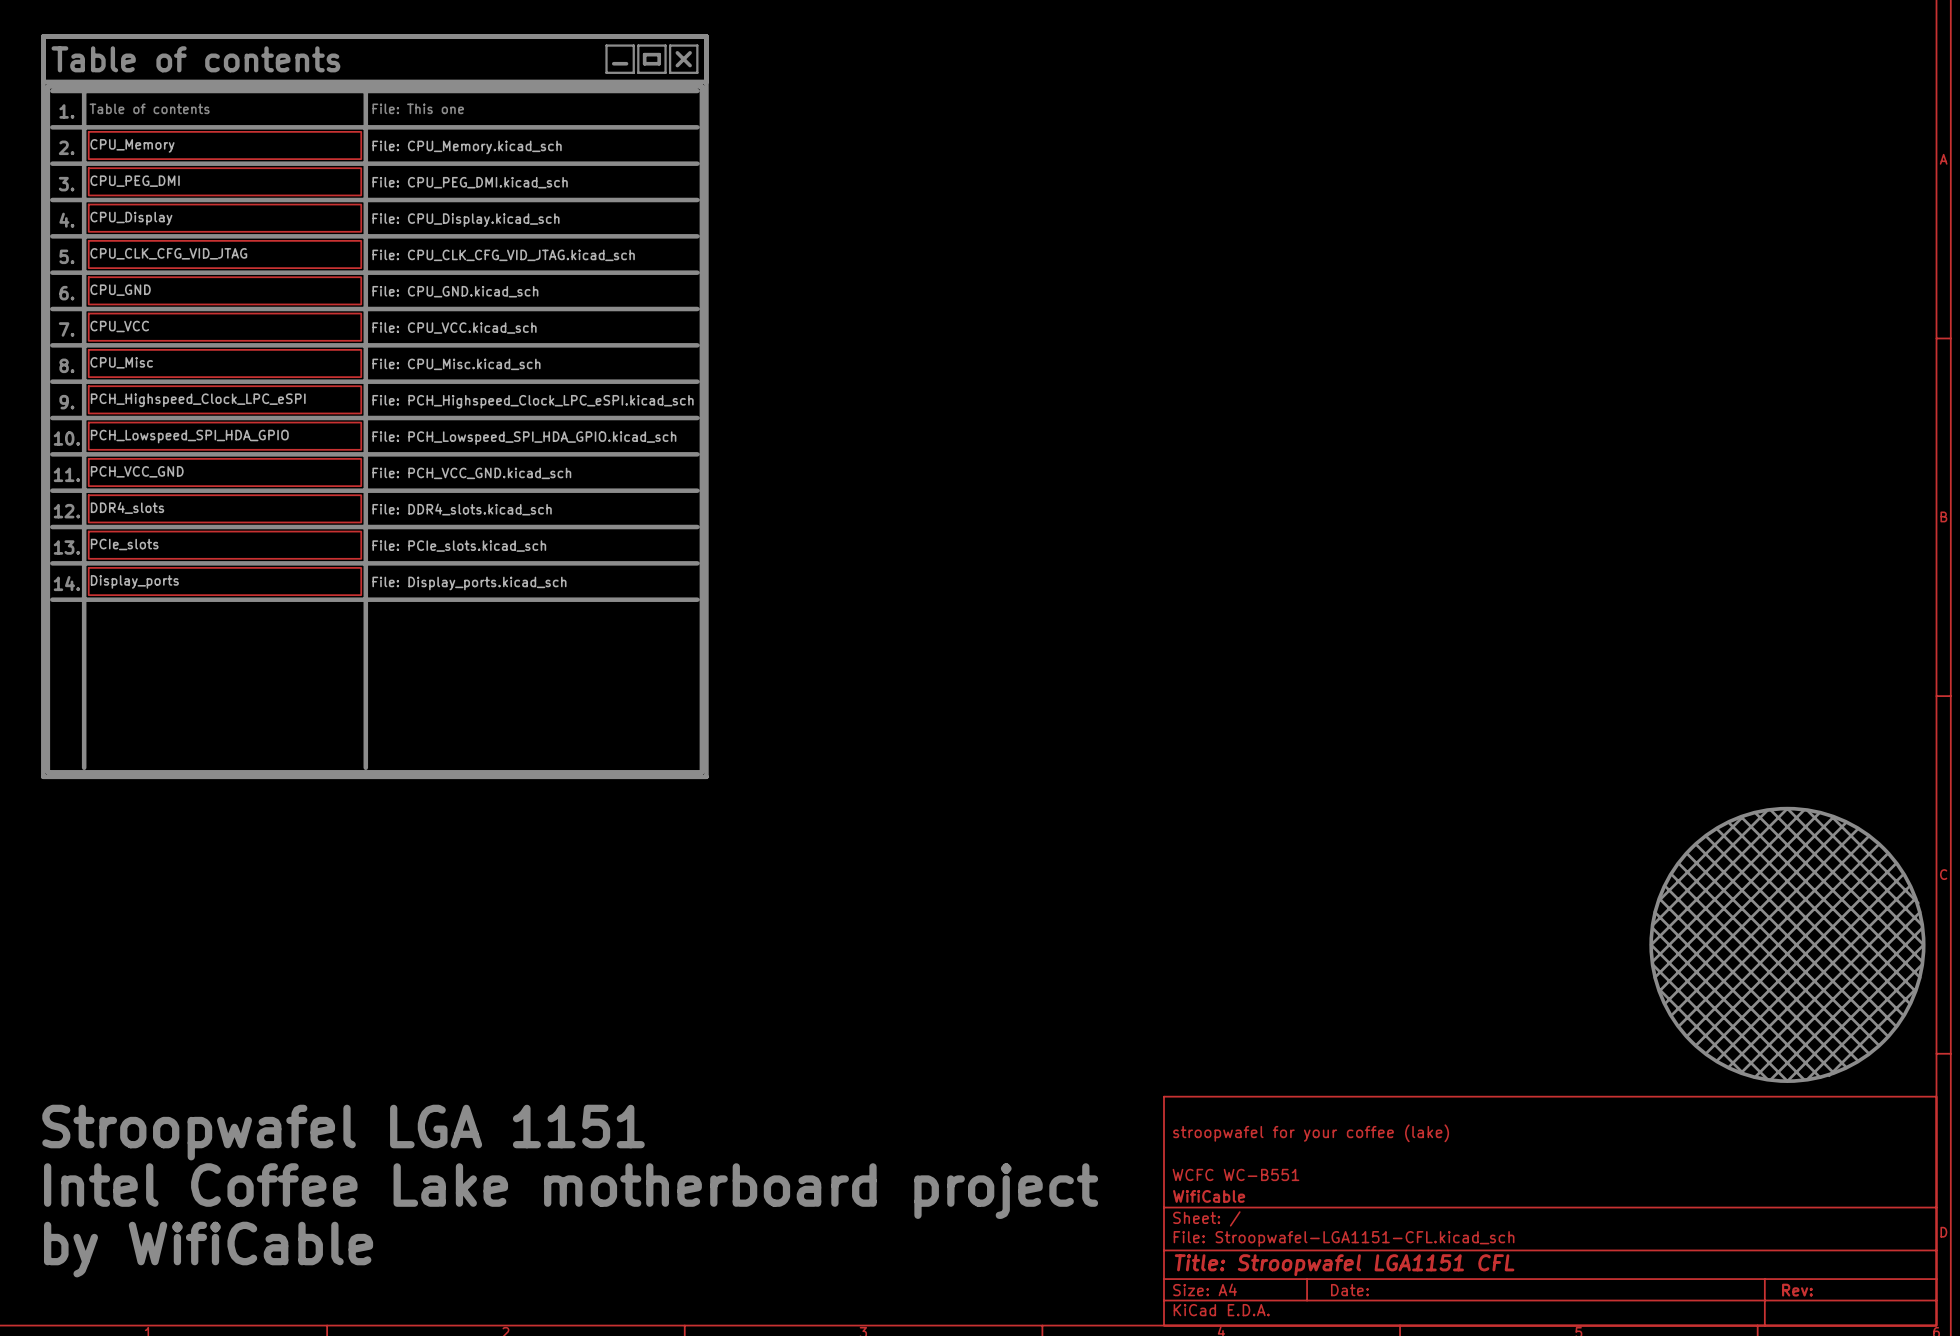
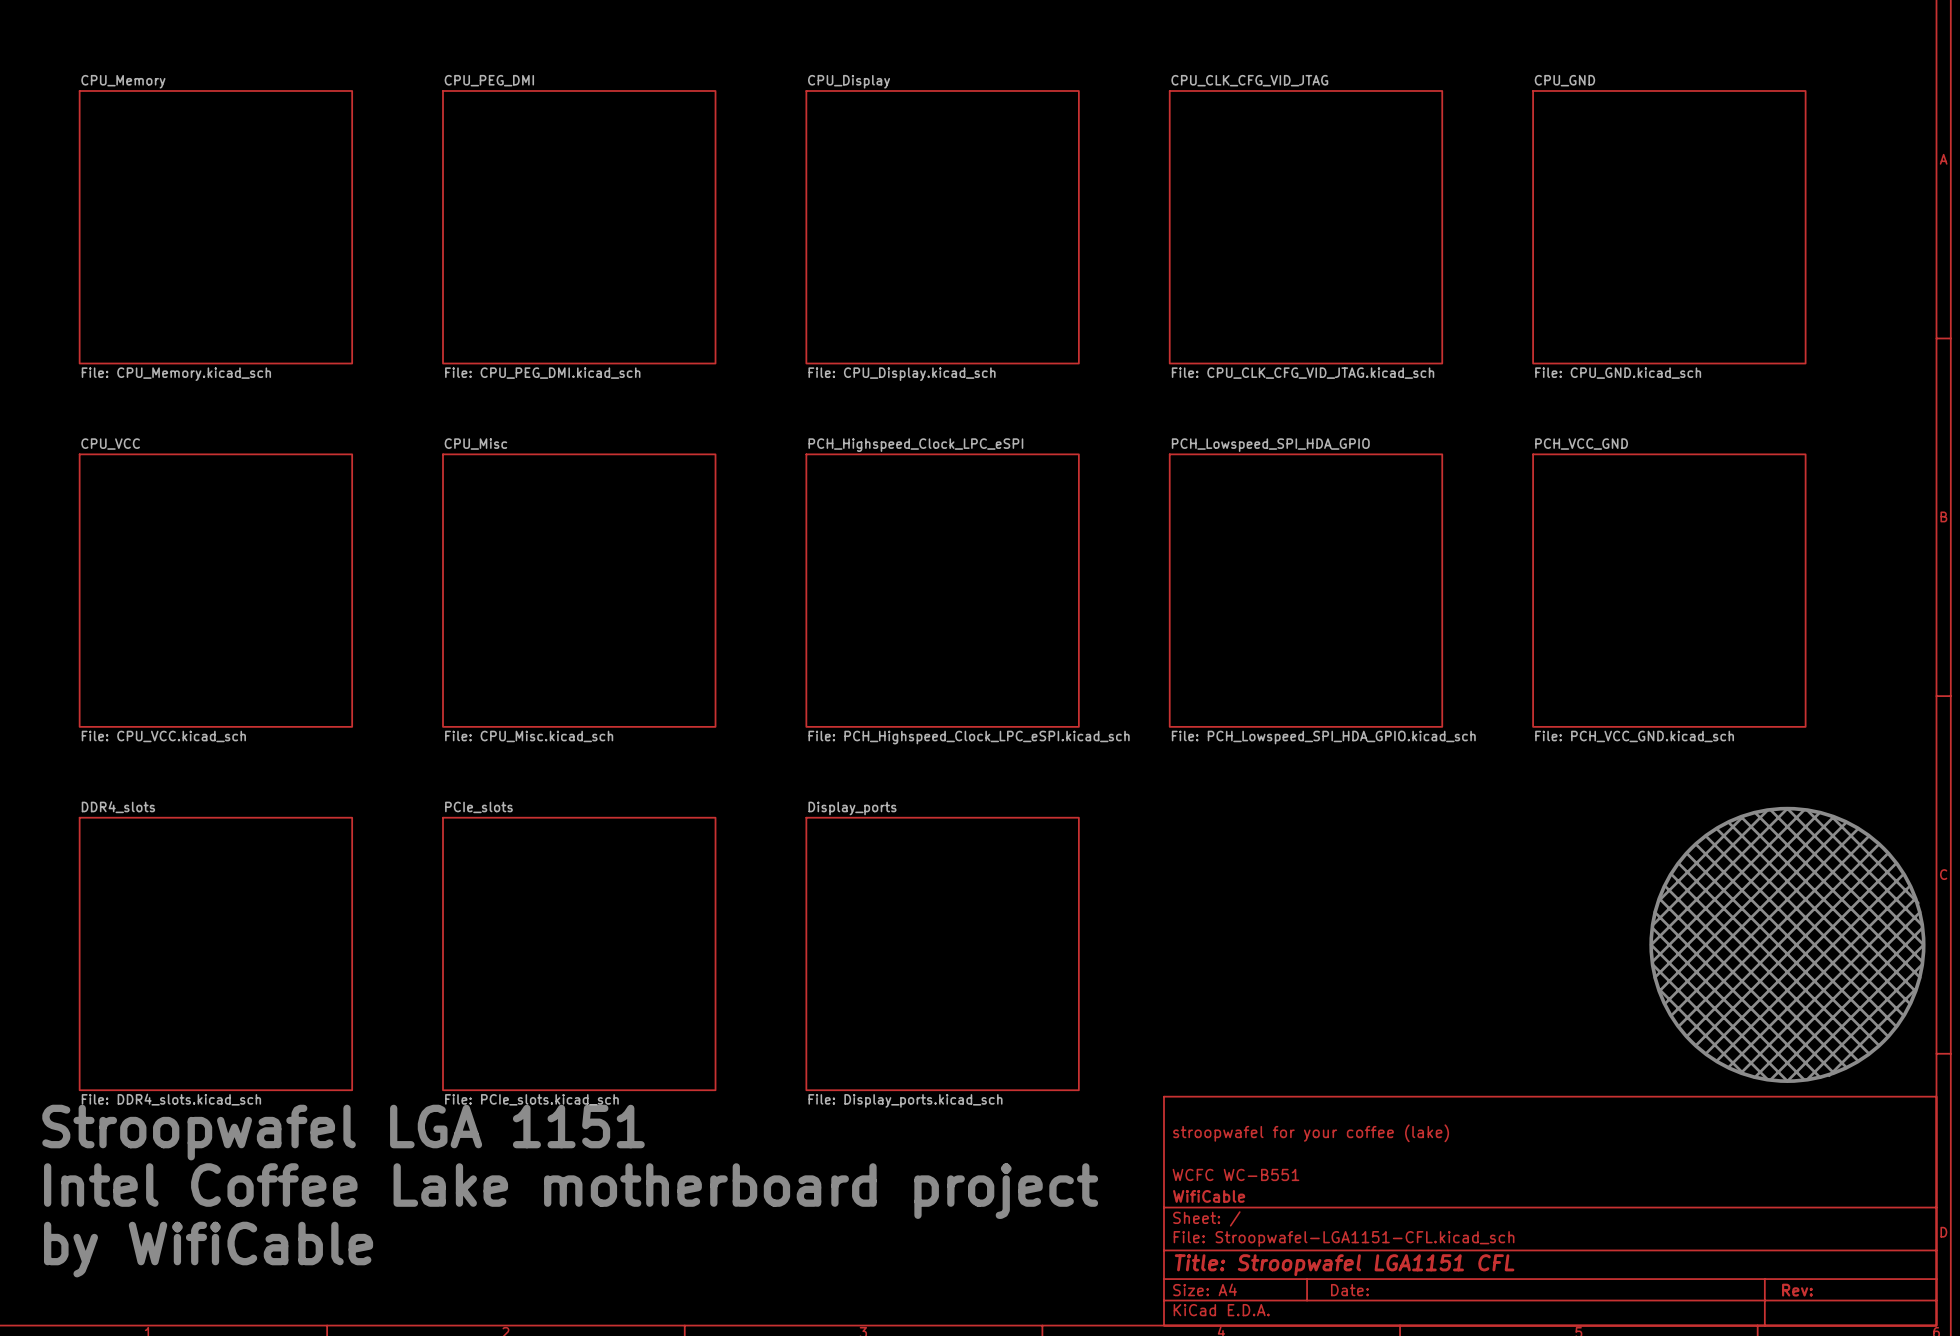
line: (43, 36) (706, 36) (706, 776) (43, 776) (43, 36) -> none
line: (606, 45) (633, 45) (633, 72) (606, 72) (606, 45) -> none
line: (638, 45) (665, 45) (665, 72) (638, 72) (638, 45) -> none
line: (670, 45) (697, 45) (697, 72) (670, 72) (670, 45) -> none
line: (677, 52) (690, 65) -> none
line: (690, 52) (677, 65) -> none
line: (644, 54) (659, 54) (659, 63) (644, 63) (644, 54) -> none
text: Table of contents (195, 59) -> none
line: (613, 63) (626, 63) -> none
line: (43, 81) (706, 81) -> none
line: (47, 86) (701, 86) (701, 772) (47, 772) (47, 86) -> none
line: (52, 90) (697, 90) -> none
line: (84, 90) (84, 767) -> none
line: (365, 90) (365, 767) -> none
text: Table of contents (149, 108) -> none
text: File: This one (418, 108) -> none
text: 1. (66, 111) -> none
line: (52, 127) (697, 127) -> none
sheet CPU_Memory: File: CPU_Memory.kicad_sch (224, 145) -> none
text: 2. (66, 147) -> none
line: (52, 163) (697, 163) -> none
sheet CPU_PEG_DMI: File: CPU_PEG_DMI.kicad_sch (224, 181) -> none
text: 3. (66, 184) -> none
line: (52, 200) (697, 200) -> none
sheet CPU_Display: File: CPU_Display.kicad_sch (224, 218) -> none
text: 4. (66, 220) -> none
sheet CPU_Memory: none -> File: CPU_Memory.kicad_sch (215, 227)
sheet CPU_PEG_DMI: none -> File: CPU_PEG_DMI.kicad_sch (579, 227)
sheet CPU_Display: none -> File: CPU_Display.kicad_sch (942, 227)
sheet CPU_CLK_CFG_VID_JTAG: none -> File: CPU_CLK_CFG_VID_JTAG.kicad_sch (1305, 227)
sheet CPU_GND: none -> File: CPU_GND.kicad_sch (1669, 227)
line: (52, 236) (697, 236) -> none
sheet CPU_CLK_CFG_VID_JTAG: File: CPU_CLK_CFG_VID_JTAG.kicad_sch (224, 254) -> none
text: 5. (66, 256) -> none
line: (52, 272) (697, 272) -> none
sheet CPU_GND: File: CPU_GND.kicad_sch (224, 290) -> none
text: 6. (66, 293) -> none
line: (52, 309) (697, 309) -> none
sheet CPU_VCC: File: CPU_VCC.kicad_sch (224, 327) -> none
text: 7. (66, 329) -> none
line: (52, 345) (697, 345) -> none
sheet CPU_Misc: File: CPU_Misc.kicad_sch (224, 363) -> none
text: 8. (66, 365) -> none
line: (52, 381) (697, 381) -> none
sheet PCH_Highspeed_Clock_LPC_eSPI: File: PCH_Highspeed_Clock_LPC_eSPI.kicad_sch (224, 399) -> none
text: 9. (66, 402) -> none
line: (52, 418) (697, 418) -> none
sheet PCH_Lowspeed_SPI_HDA_GPIO: File: PCH_Lowspeed_SPI_HDA_GPIO.kicad_sch (224, 436) -> none
text: 10. (66, 438) -> none
line: (52, 454) (697, 454) -> none
sheet PCH_VCC_GND: File: PCH_VCC_GND.kicad_sch (224, 472) -> none
text: 11. (66, 474) -> none
line: (52, 490) (697, 490) -> none
sheet DDR4_slots shape: [88, 494, 362, 524] -> [79, 817, 353, 1091]
sheet DDR4_slots name position: DDR4_slots (127, 507) -> DDR4_slots (118, 807)
sheet DDR4_slots value position: File: DDR4_slots.kicad_sch (462, 509) -> File: DDR4_slots.kicad_sch (171, 1099)
text: 12. (66, 511) -> none
line: (52, 527) (697, 527) -> none
sheet PCIe_slots: File: PCIe_slots.kicad_sch (224, 545) -> none
text: 13. (66, 547) -> none
line: (52, 563) (697, 563) -> none
sheet Display_ports: File: Display_ports.kicad_sch (224, 581) -> none
text: 14. (66, 583) -> none
sheet CPU_VCC: none -> File: CPU_VCC.kicad_sch (215, 590)
sheet CPU_Misc: none -> File: CPU_Misc.kicad_sch (579, 590)
sheet PCH_Highspeed_Clock_LPC_eSPI: none -> File: PCH_Highspeed_Clock_LPC_eSPI.kicad_sch (942, 590)
sheet PCH_Lowspeed_SPI_HDA_GPIO: none -> File: PCH_Lowspeed_SPI_HDA_GPIO.kicad_sch (1305, 590)
sheet PCH_VCC_GND: none -> File: PCH_VCC_GND.kicad_sch (1669, 590)
line: (52, 599) (697, 599) -> none
sheet PCIe_slots: none -> File: PCIe_slots.kicad_sch (579, 953)
sheet Display_ports: none -> File: Display_ports.kicad_sch (942, 953)

